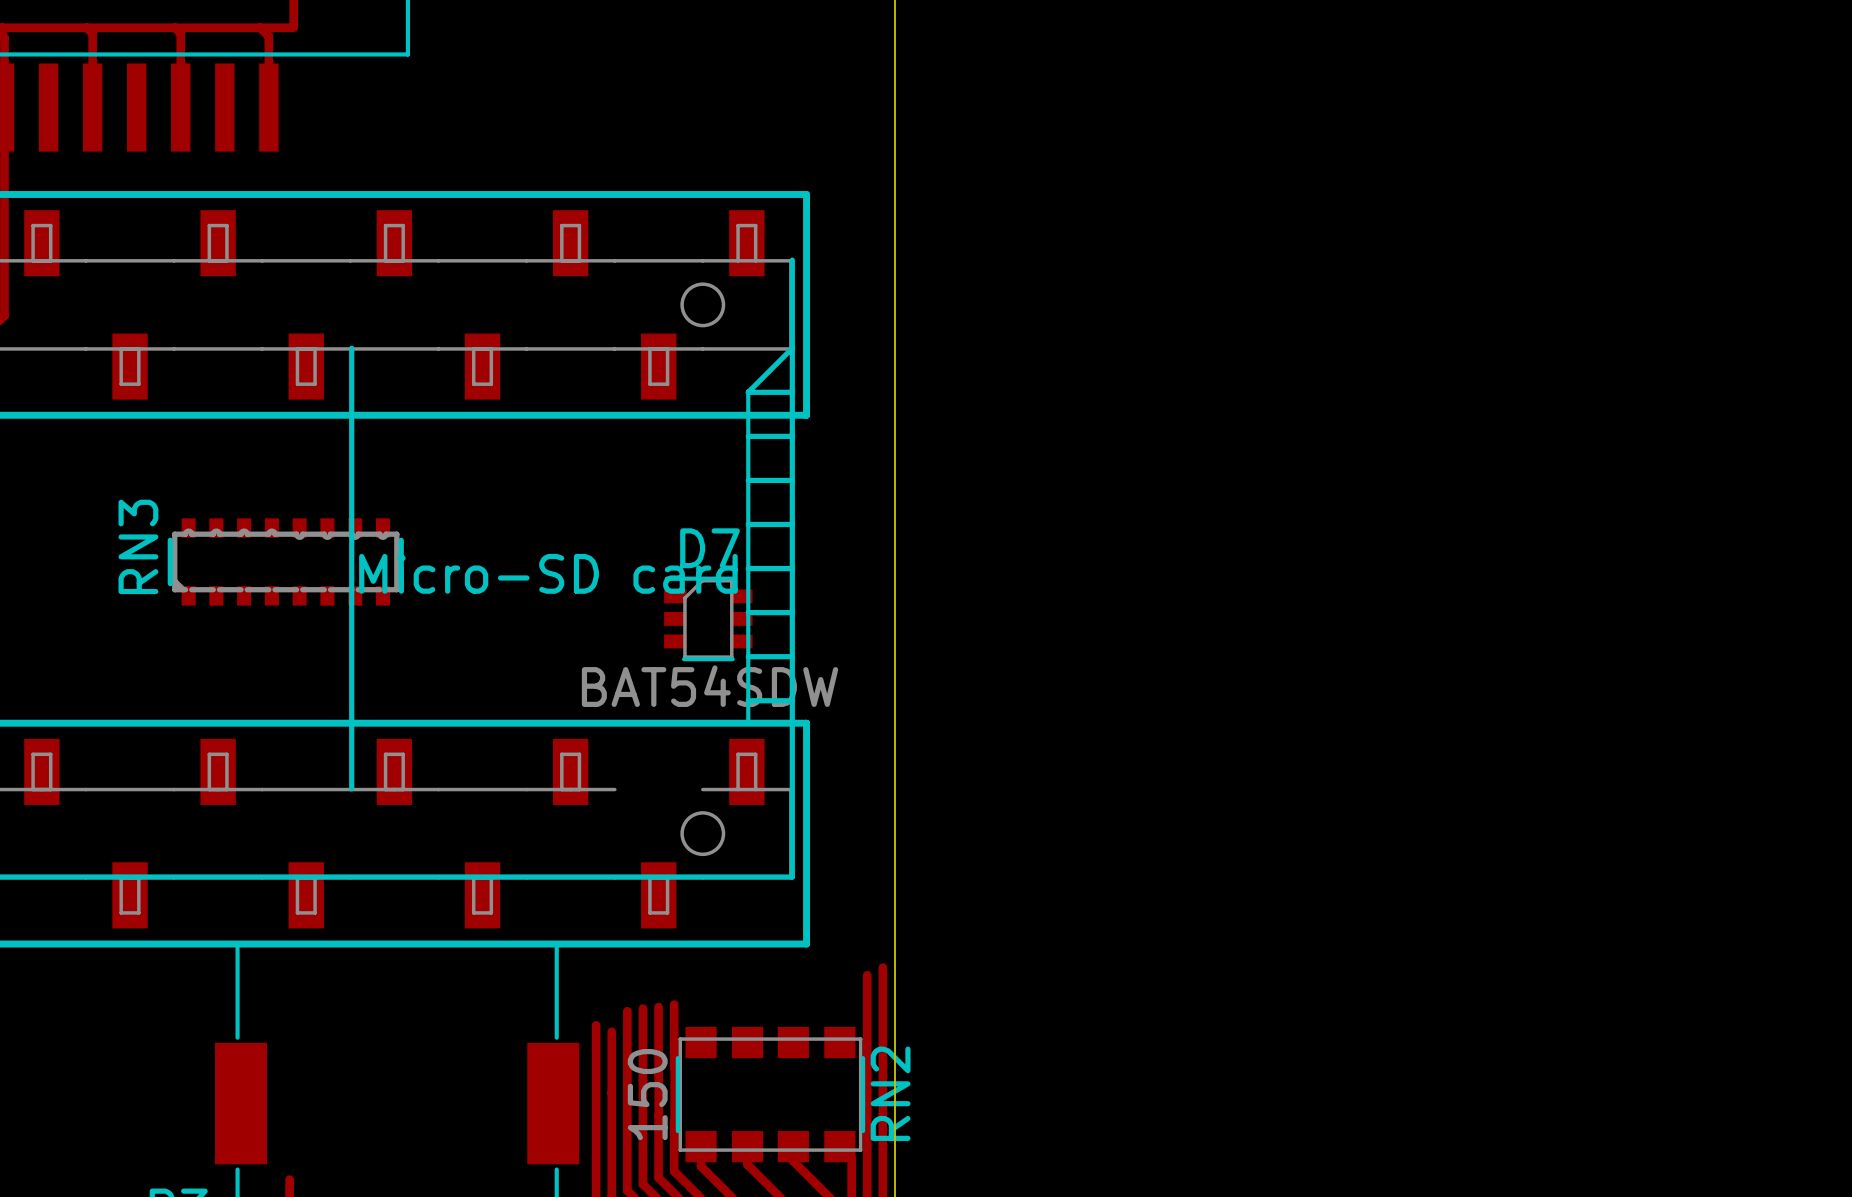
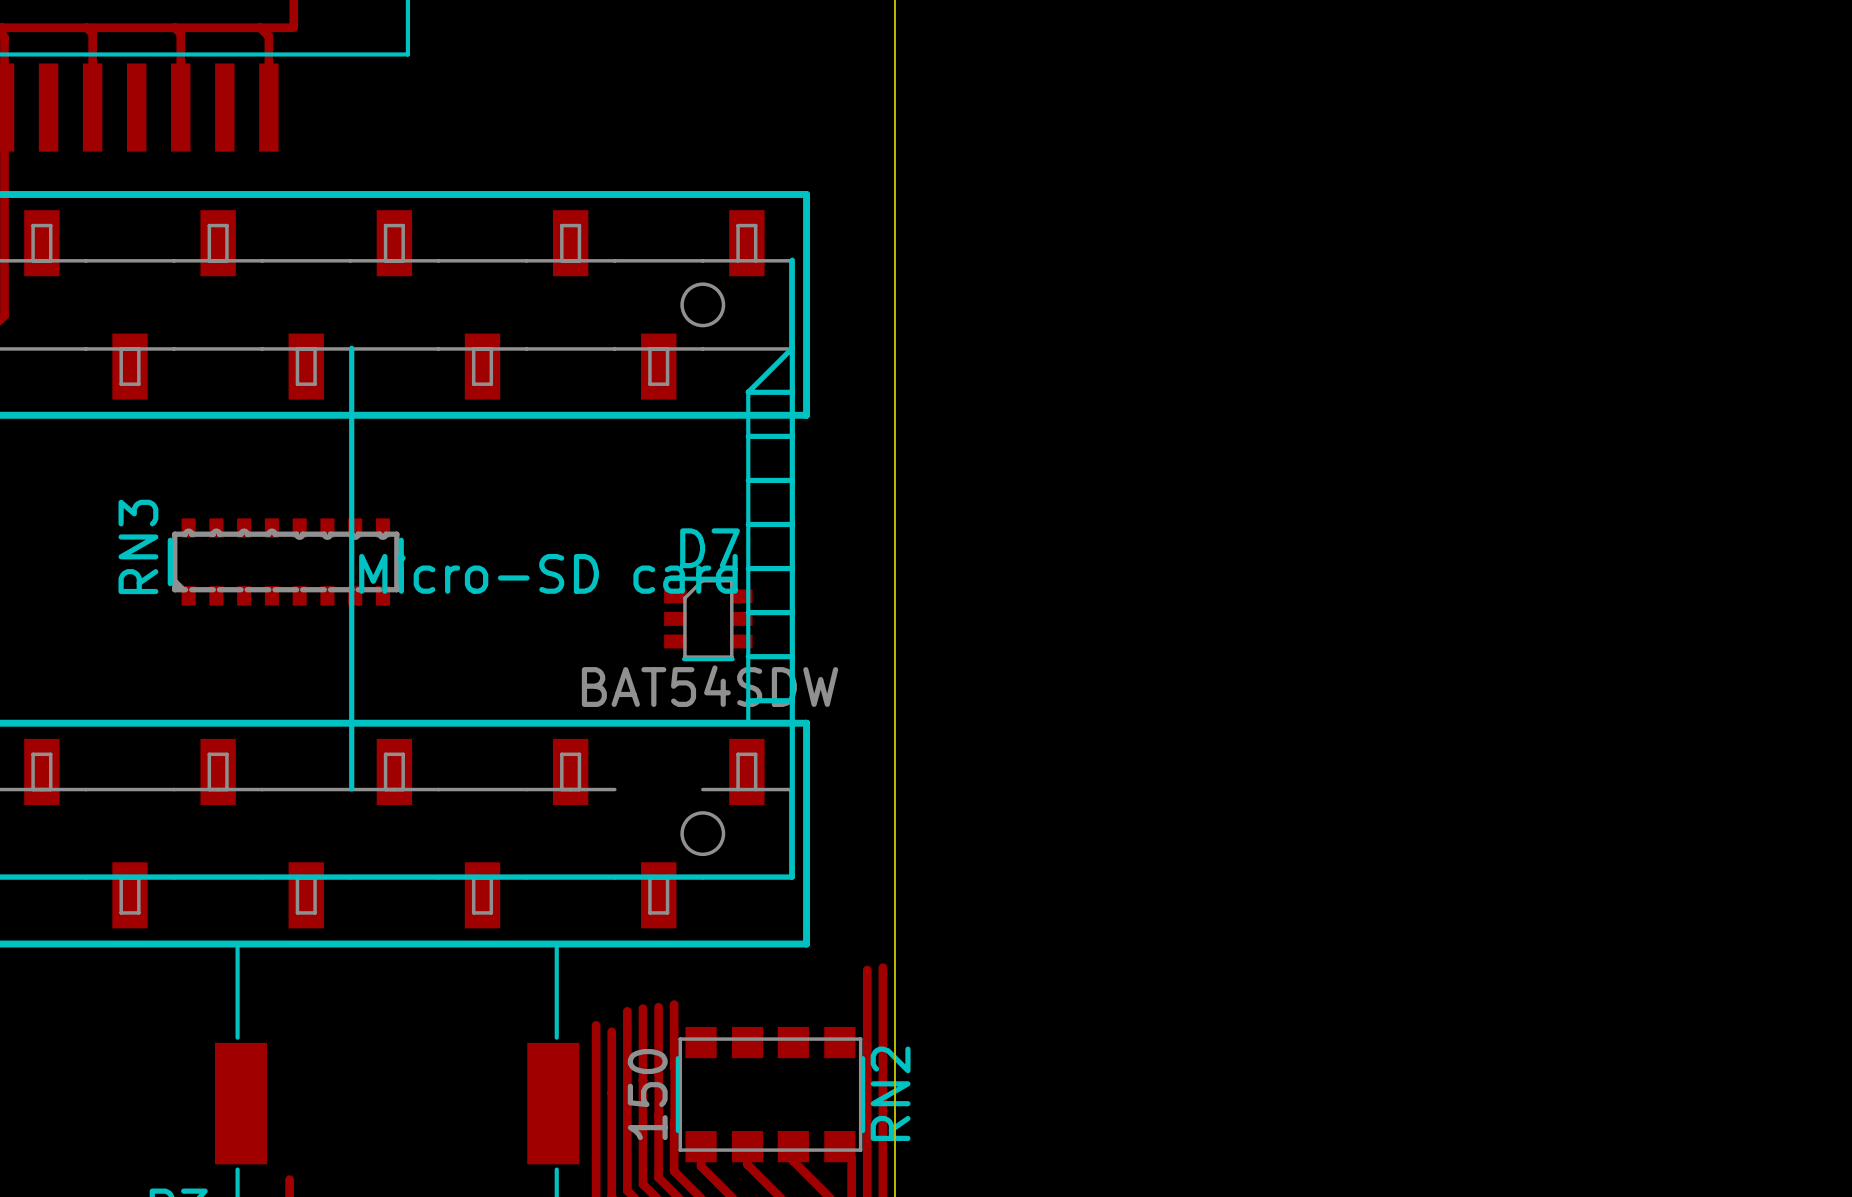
top track: none -> (867, 970) (867, 975)

